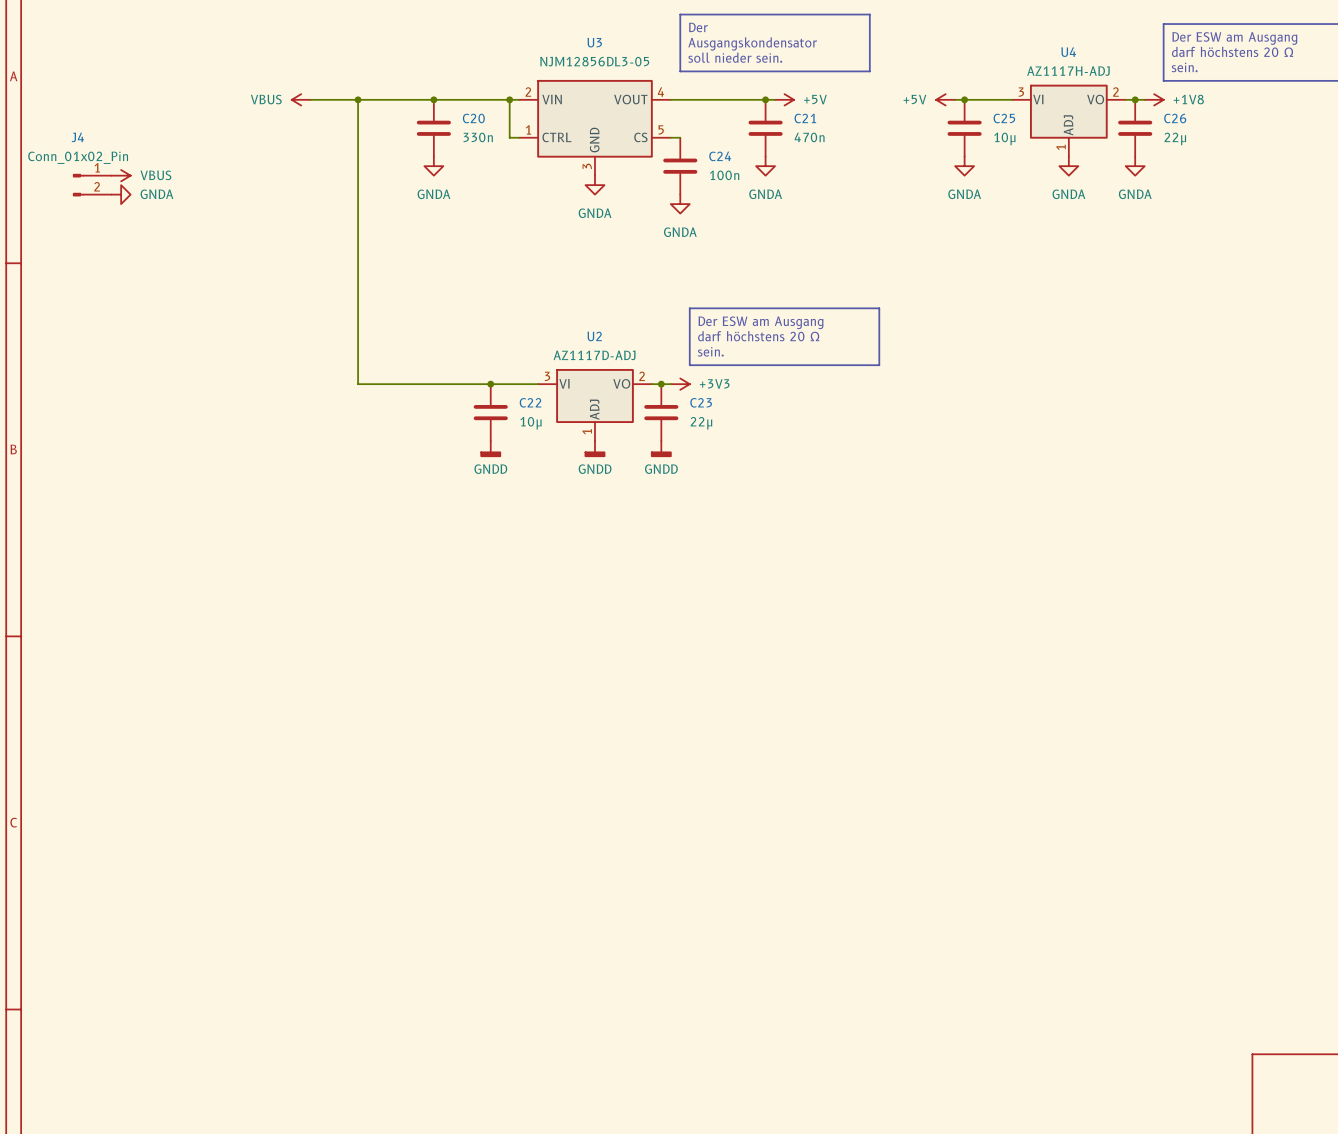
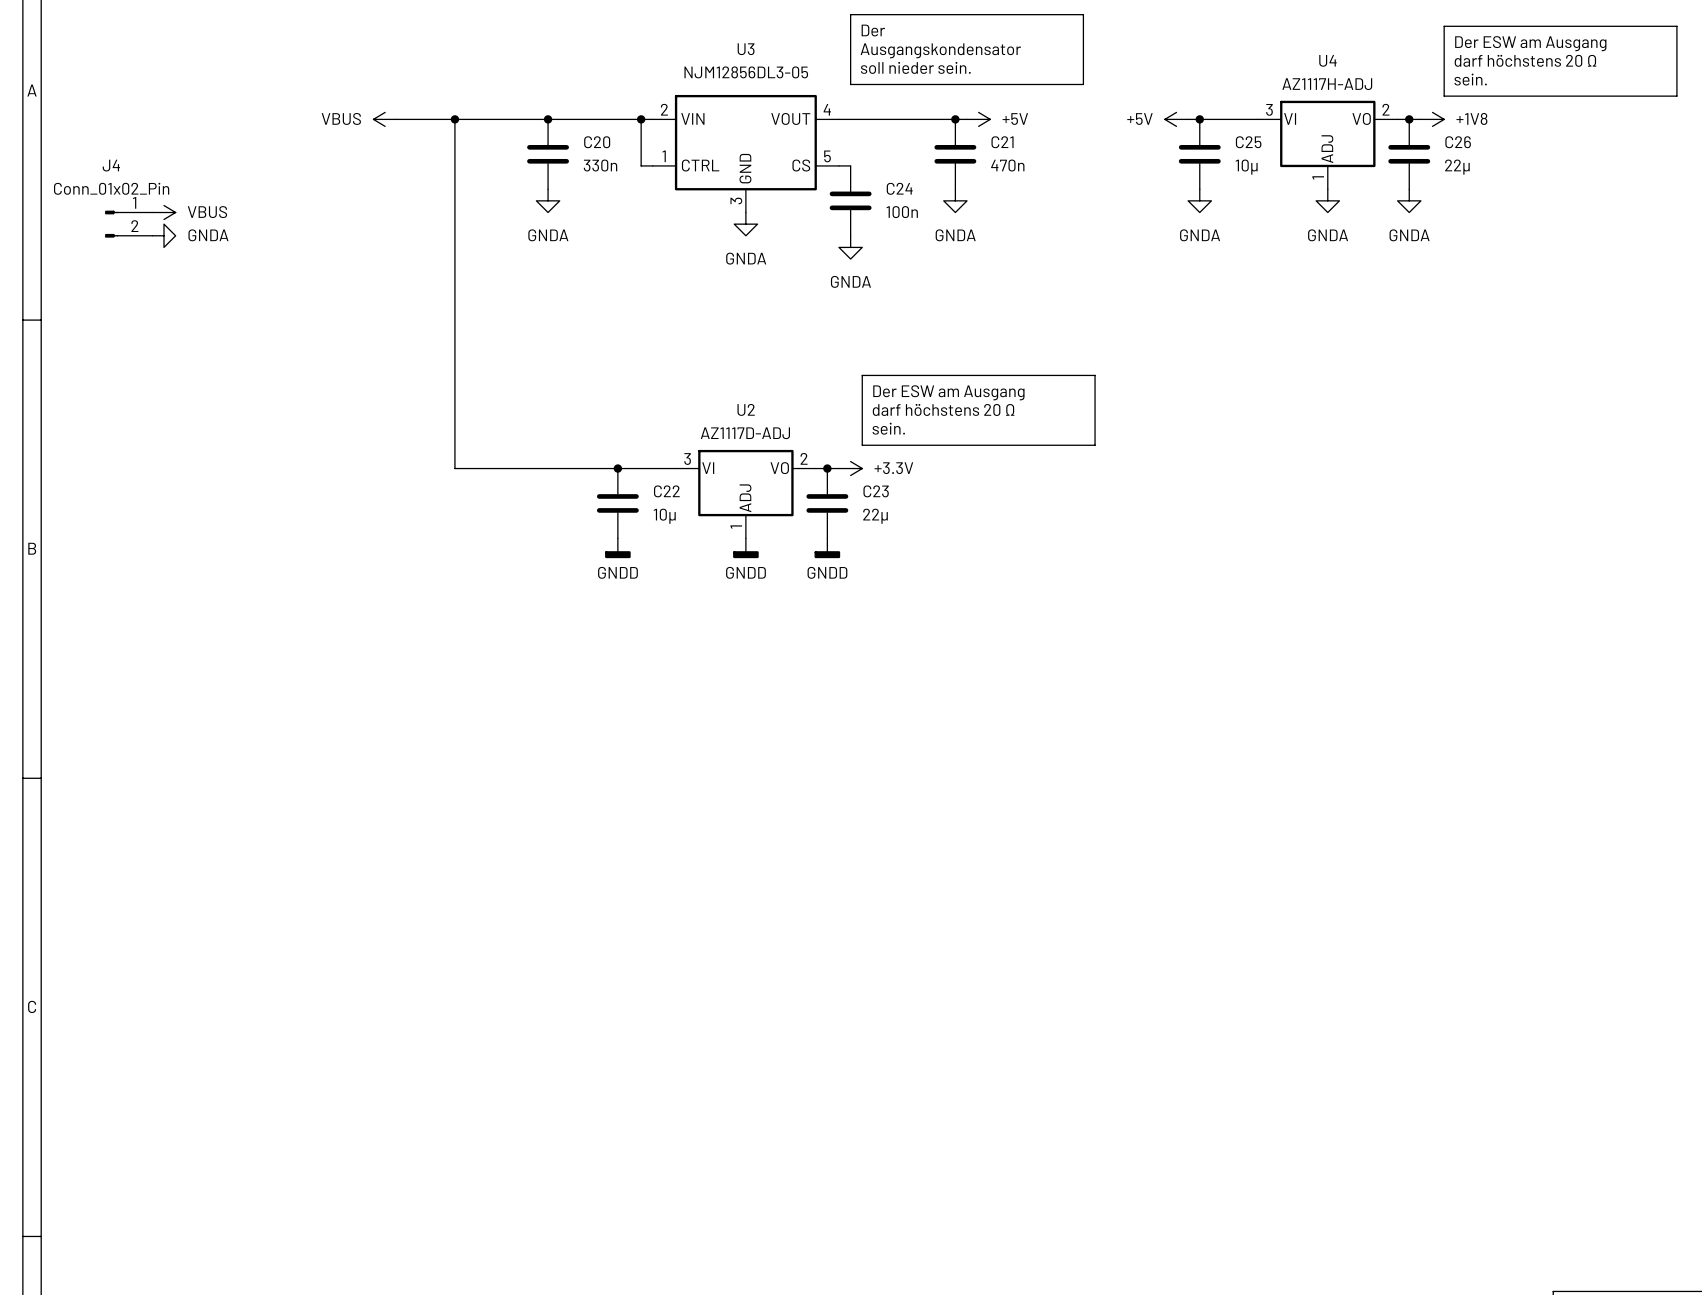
power symbol: +3V3 (680, 384) -> +3.3V (850, 468)

